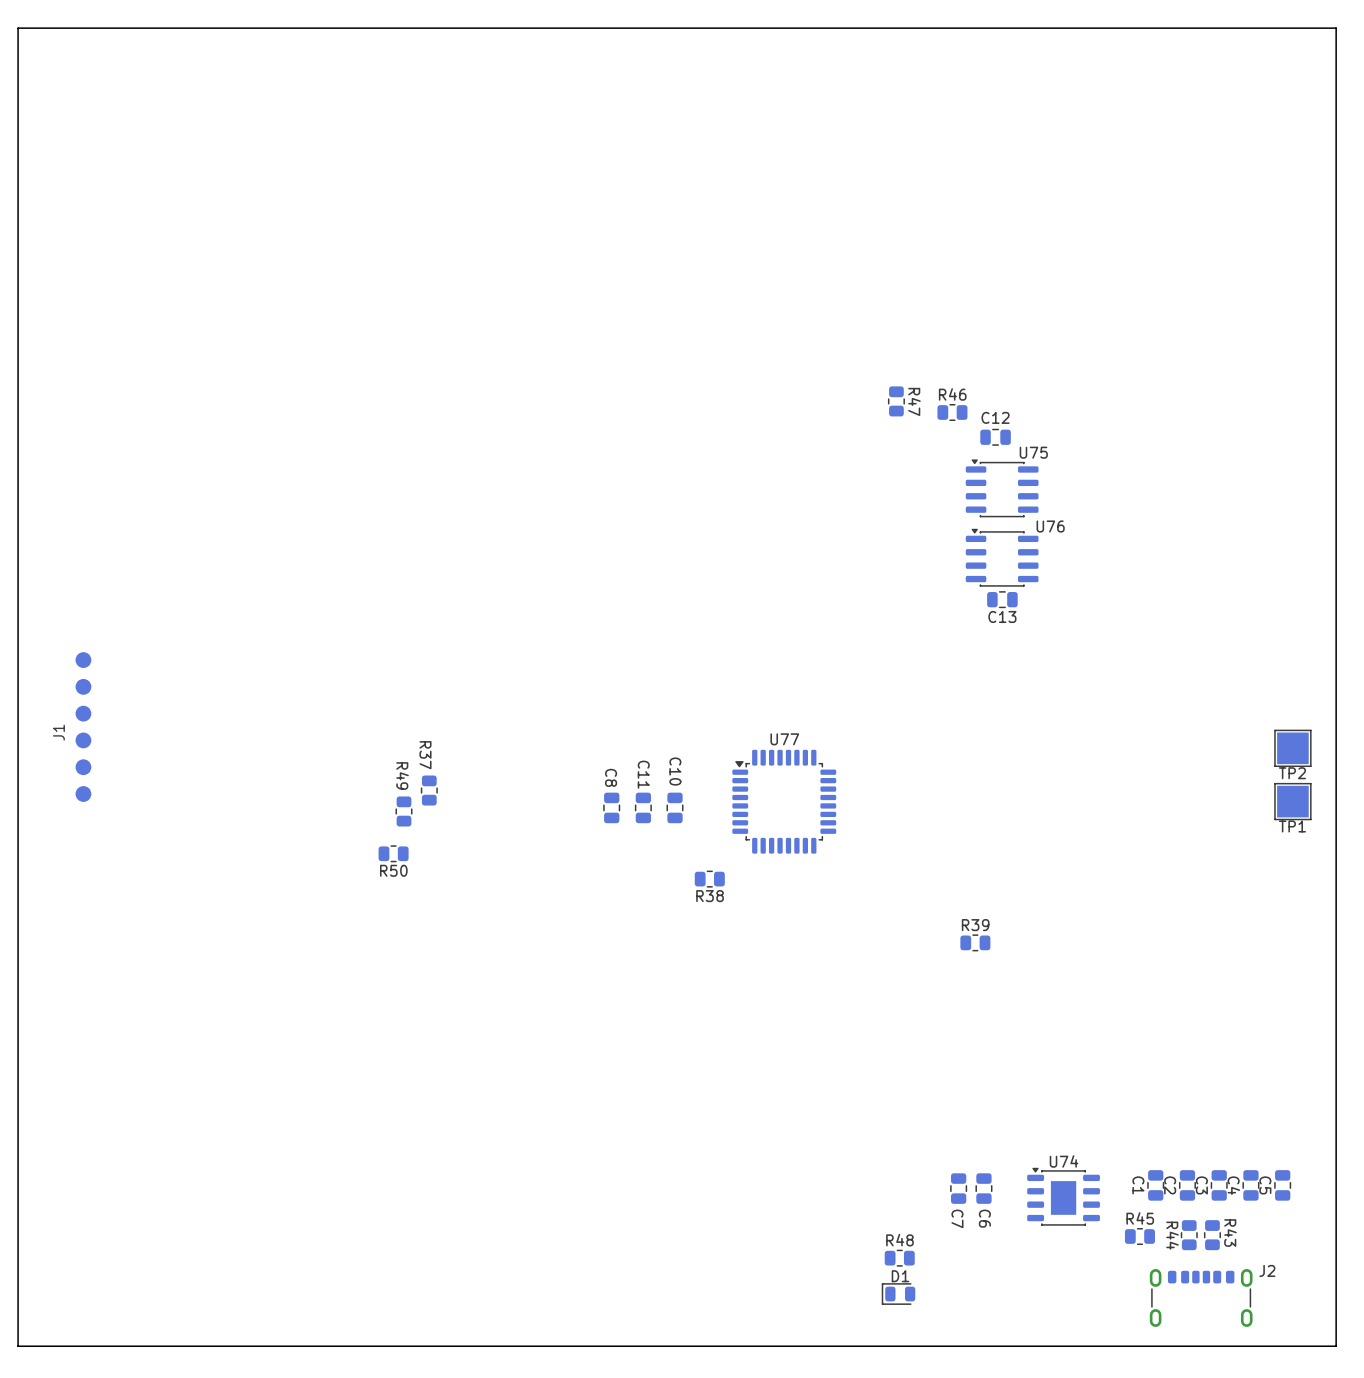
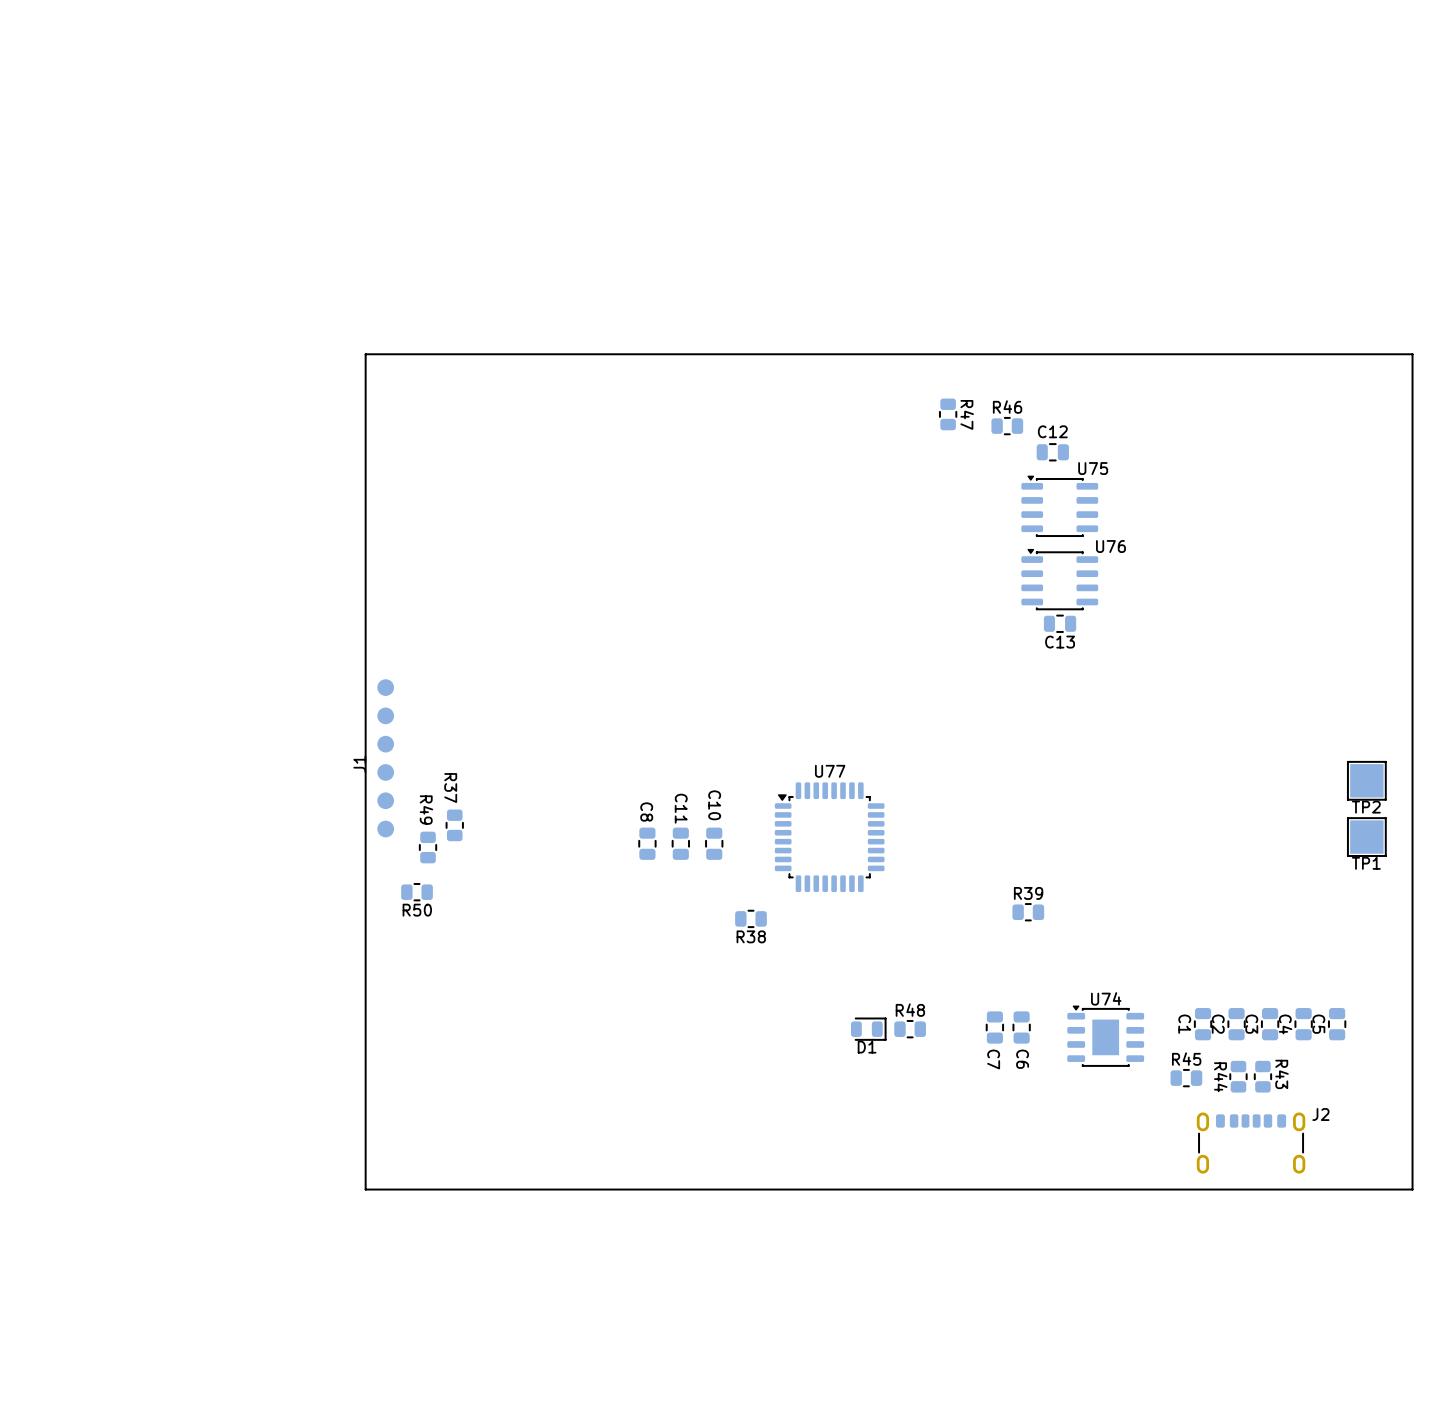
board edge: (1336, 344) (1336, 28) (18, 28) (18, 1346) (1336, 1346) (1336, 1135) -> (1412, 354) (365, 354) (365, 1189) (1412, 1189)
J1 position: (83, 727) -> (385, 758)
R39 position: (975, 942) -> (1028, 912)
C1 position: (1155, 1185) -> (1203, 1024)
C2 position: (1187, 1185) -> (1236, 1024)
C3 position: (1219, 1185) -> (1270, 1024)
C4 position: (1250, 1185) -> (1303, 1024)
C5 position: (1282, 1185) -> (1337, 1024)
C7 position: (958, 1188) -> (994, 1027)
C6 position: (983, 1188) -> (1021, 1027)
U74 position: (1063, 1196) -> (1105, 1036)
R44 position: (1189, 1235) -> (1238, 1076)
R43 position: (1212, 1235) -> (1262, 1076)
R45 position: (1139, 1236) -> (1186, 1078)
R48 position: (899, 1258) -> (910, 1029)
D1 rotation: 0° (898, 1294) -> 180° (868, 1029)
D1 position: (898, 1294) -> (868, 1029)
J2 position: (1201, 1297) -> (1251, 1143)

